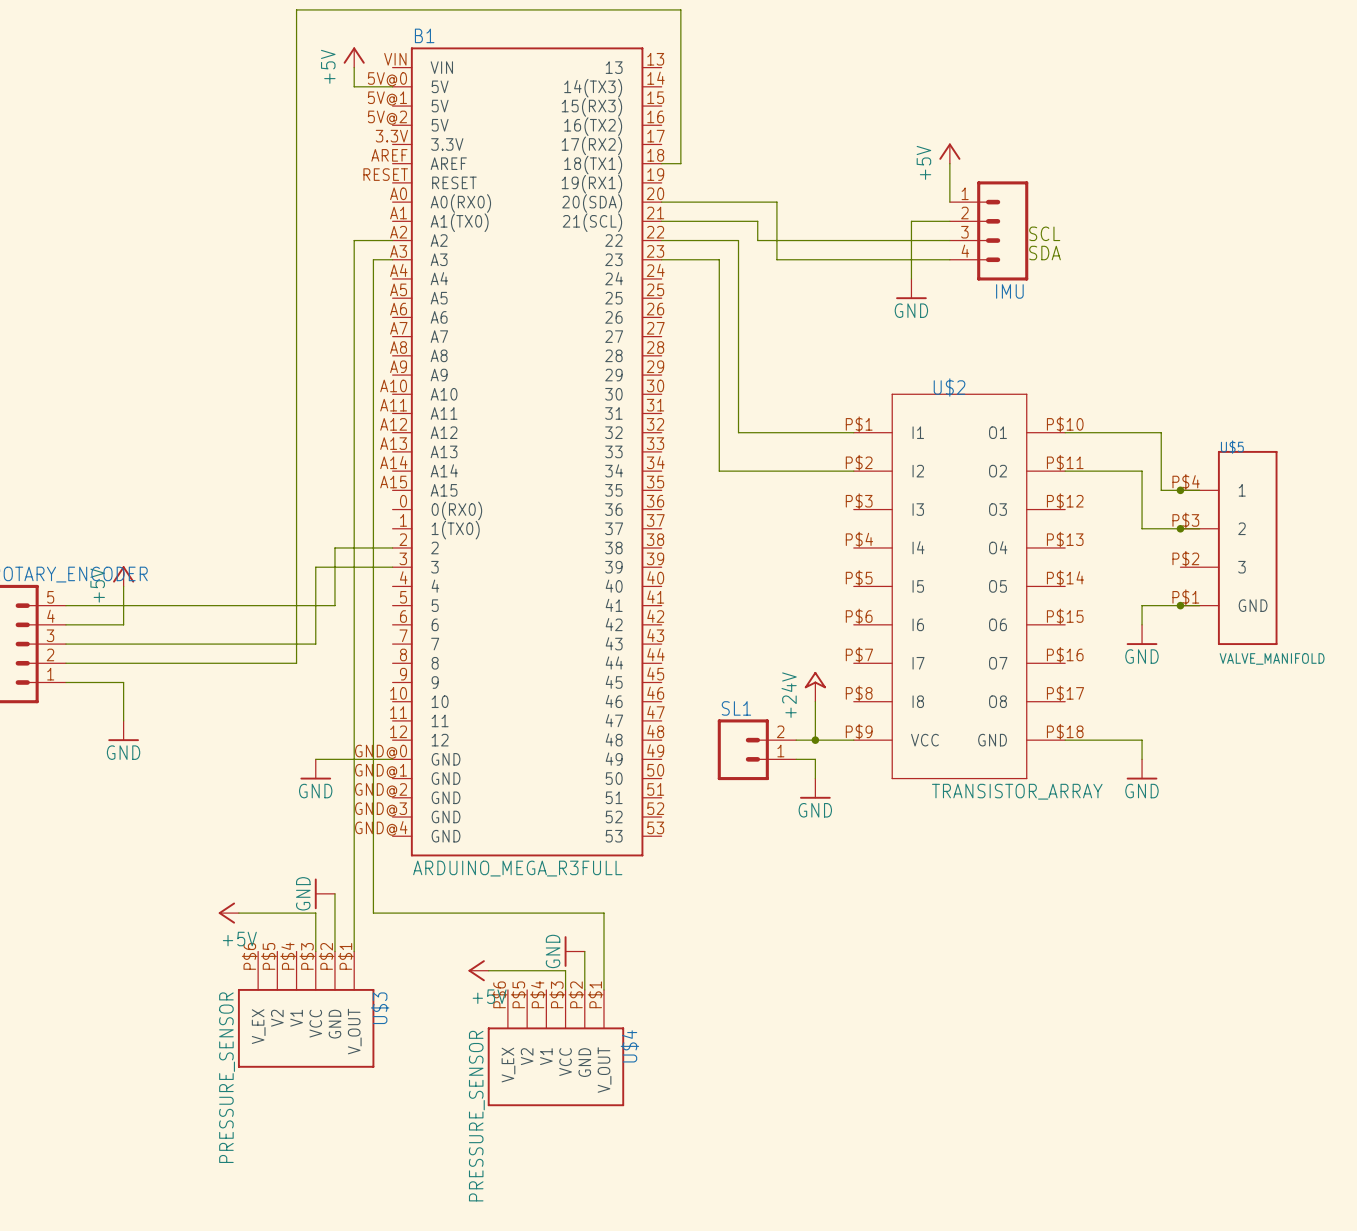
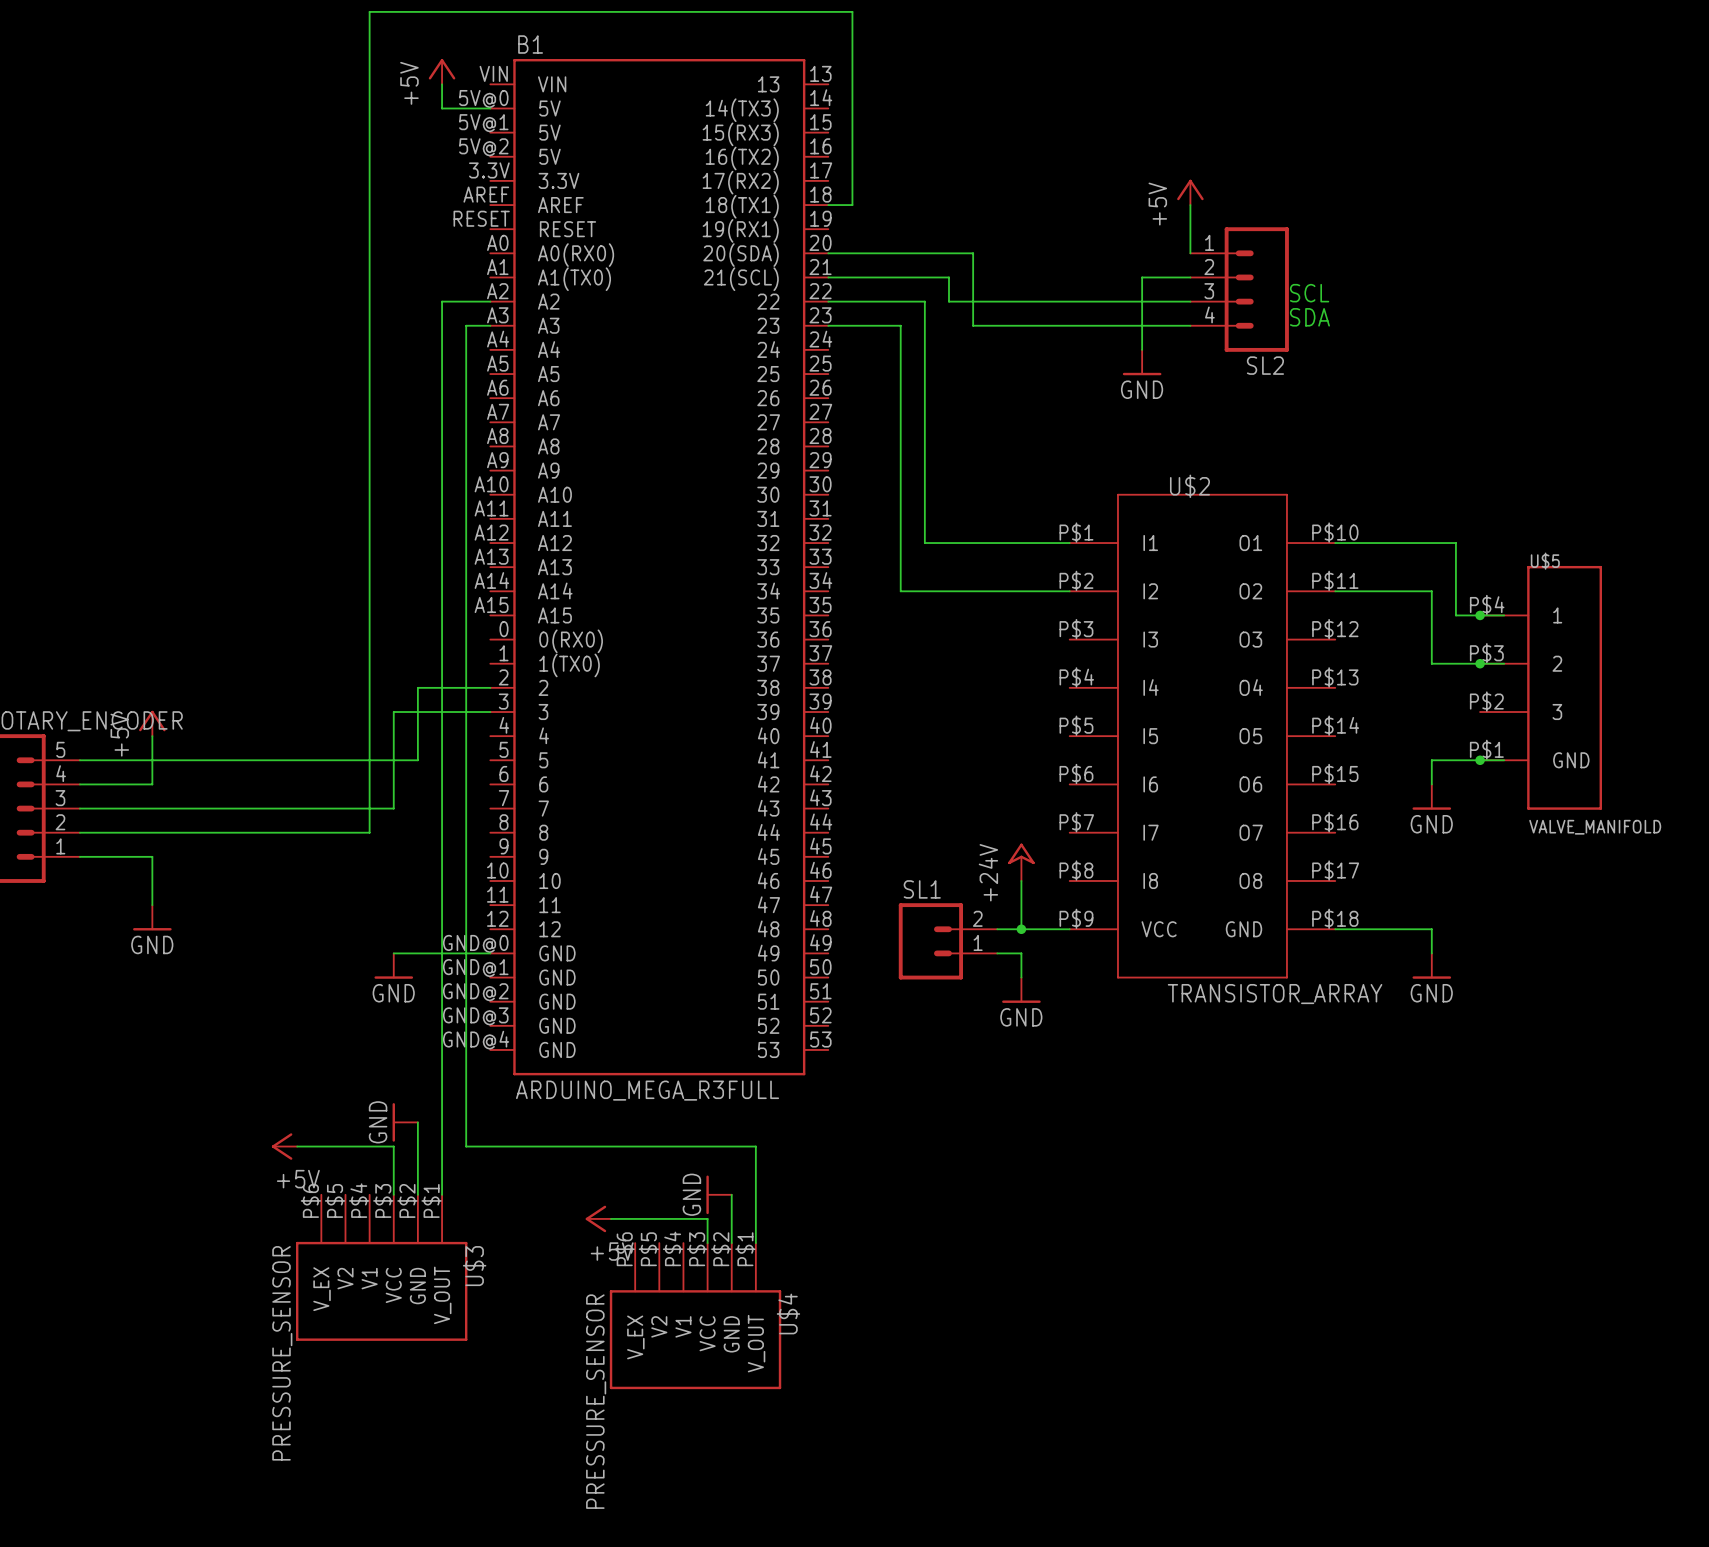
IMU name: IMU (1009, 291) -> SL2 (1265, 365)

